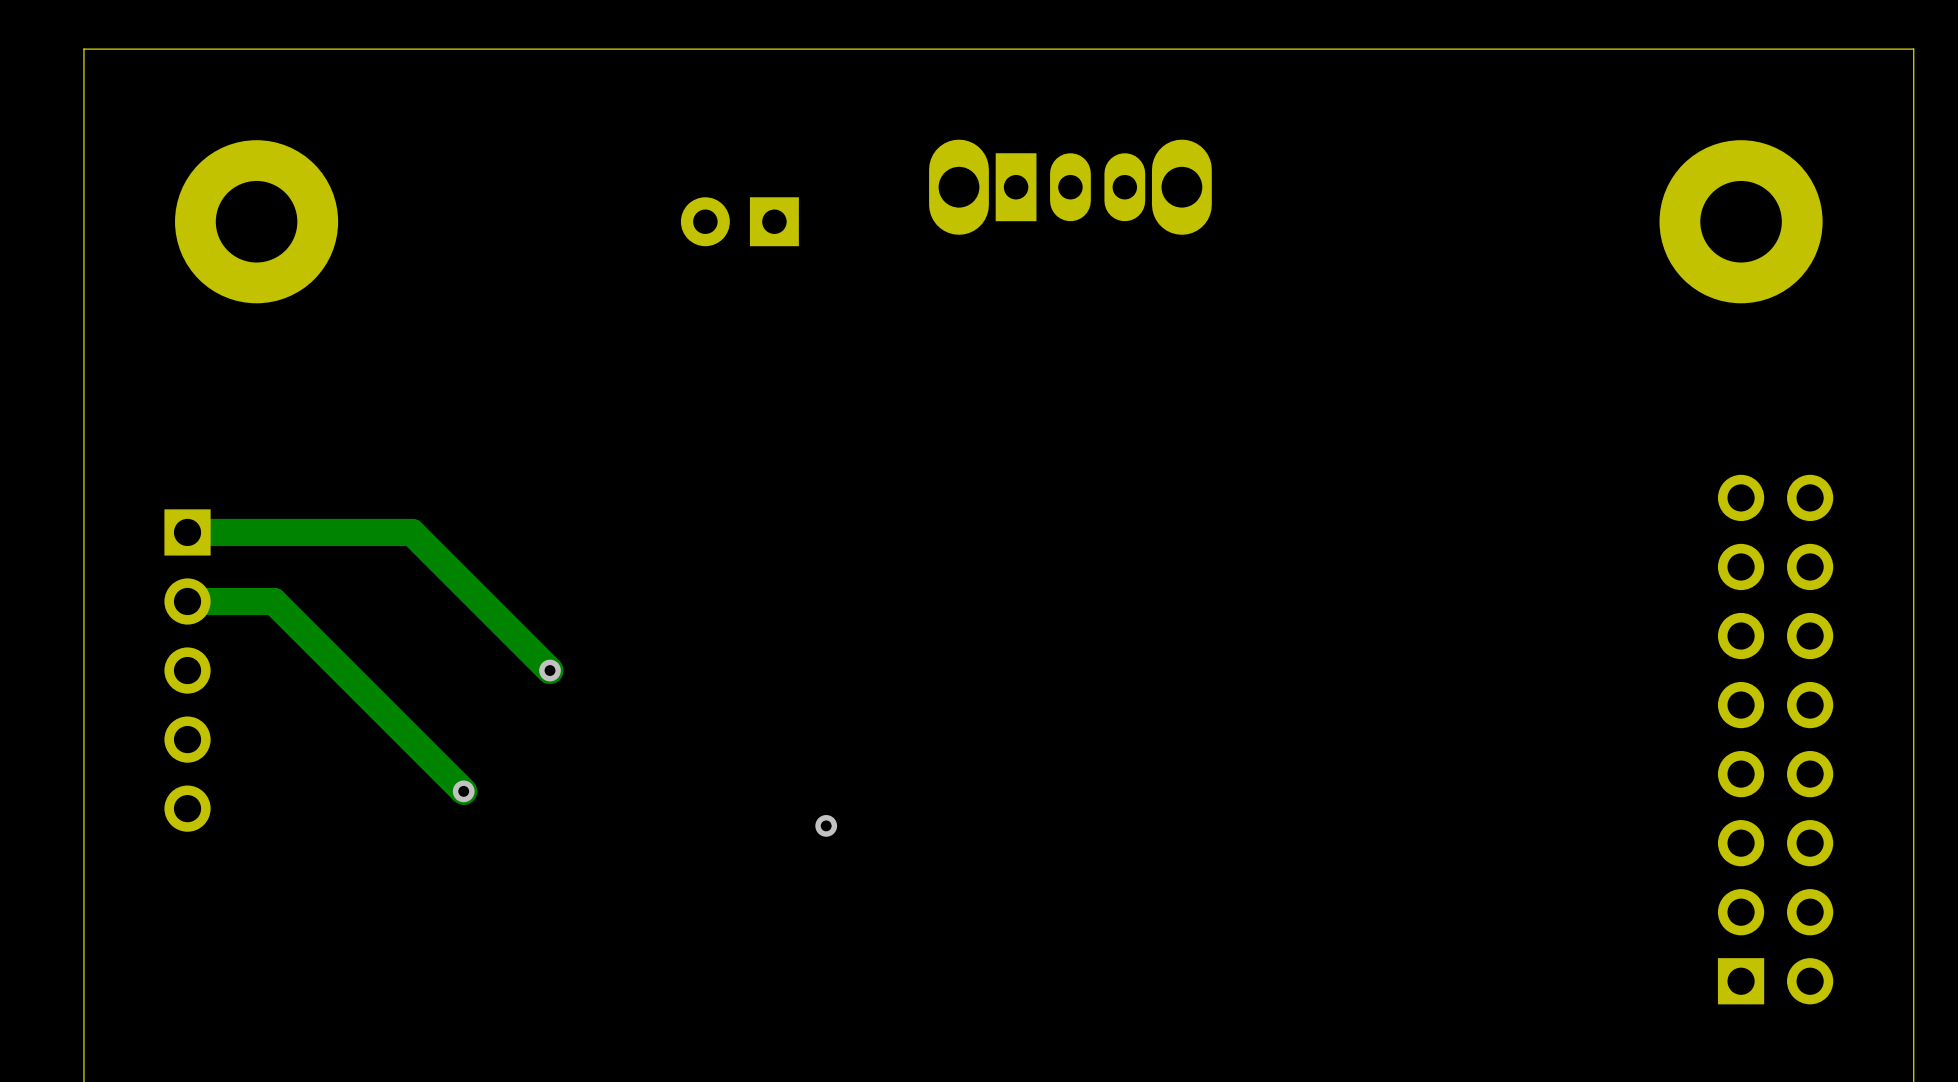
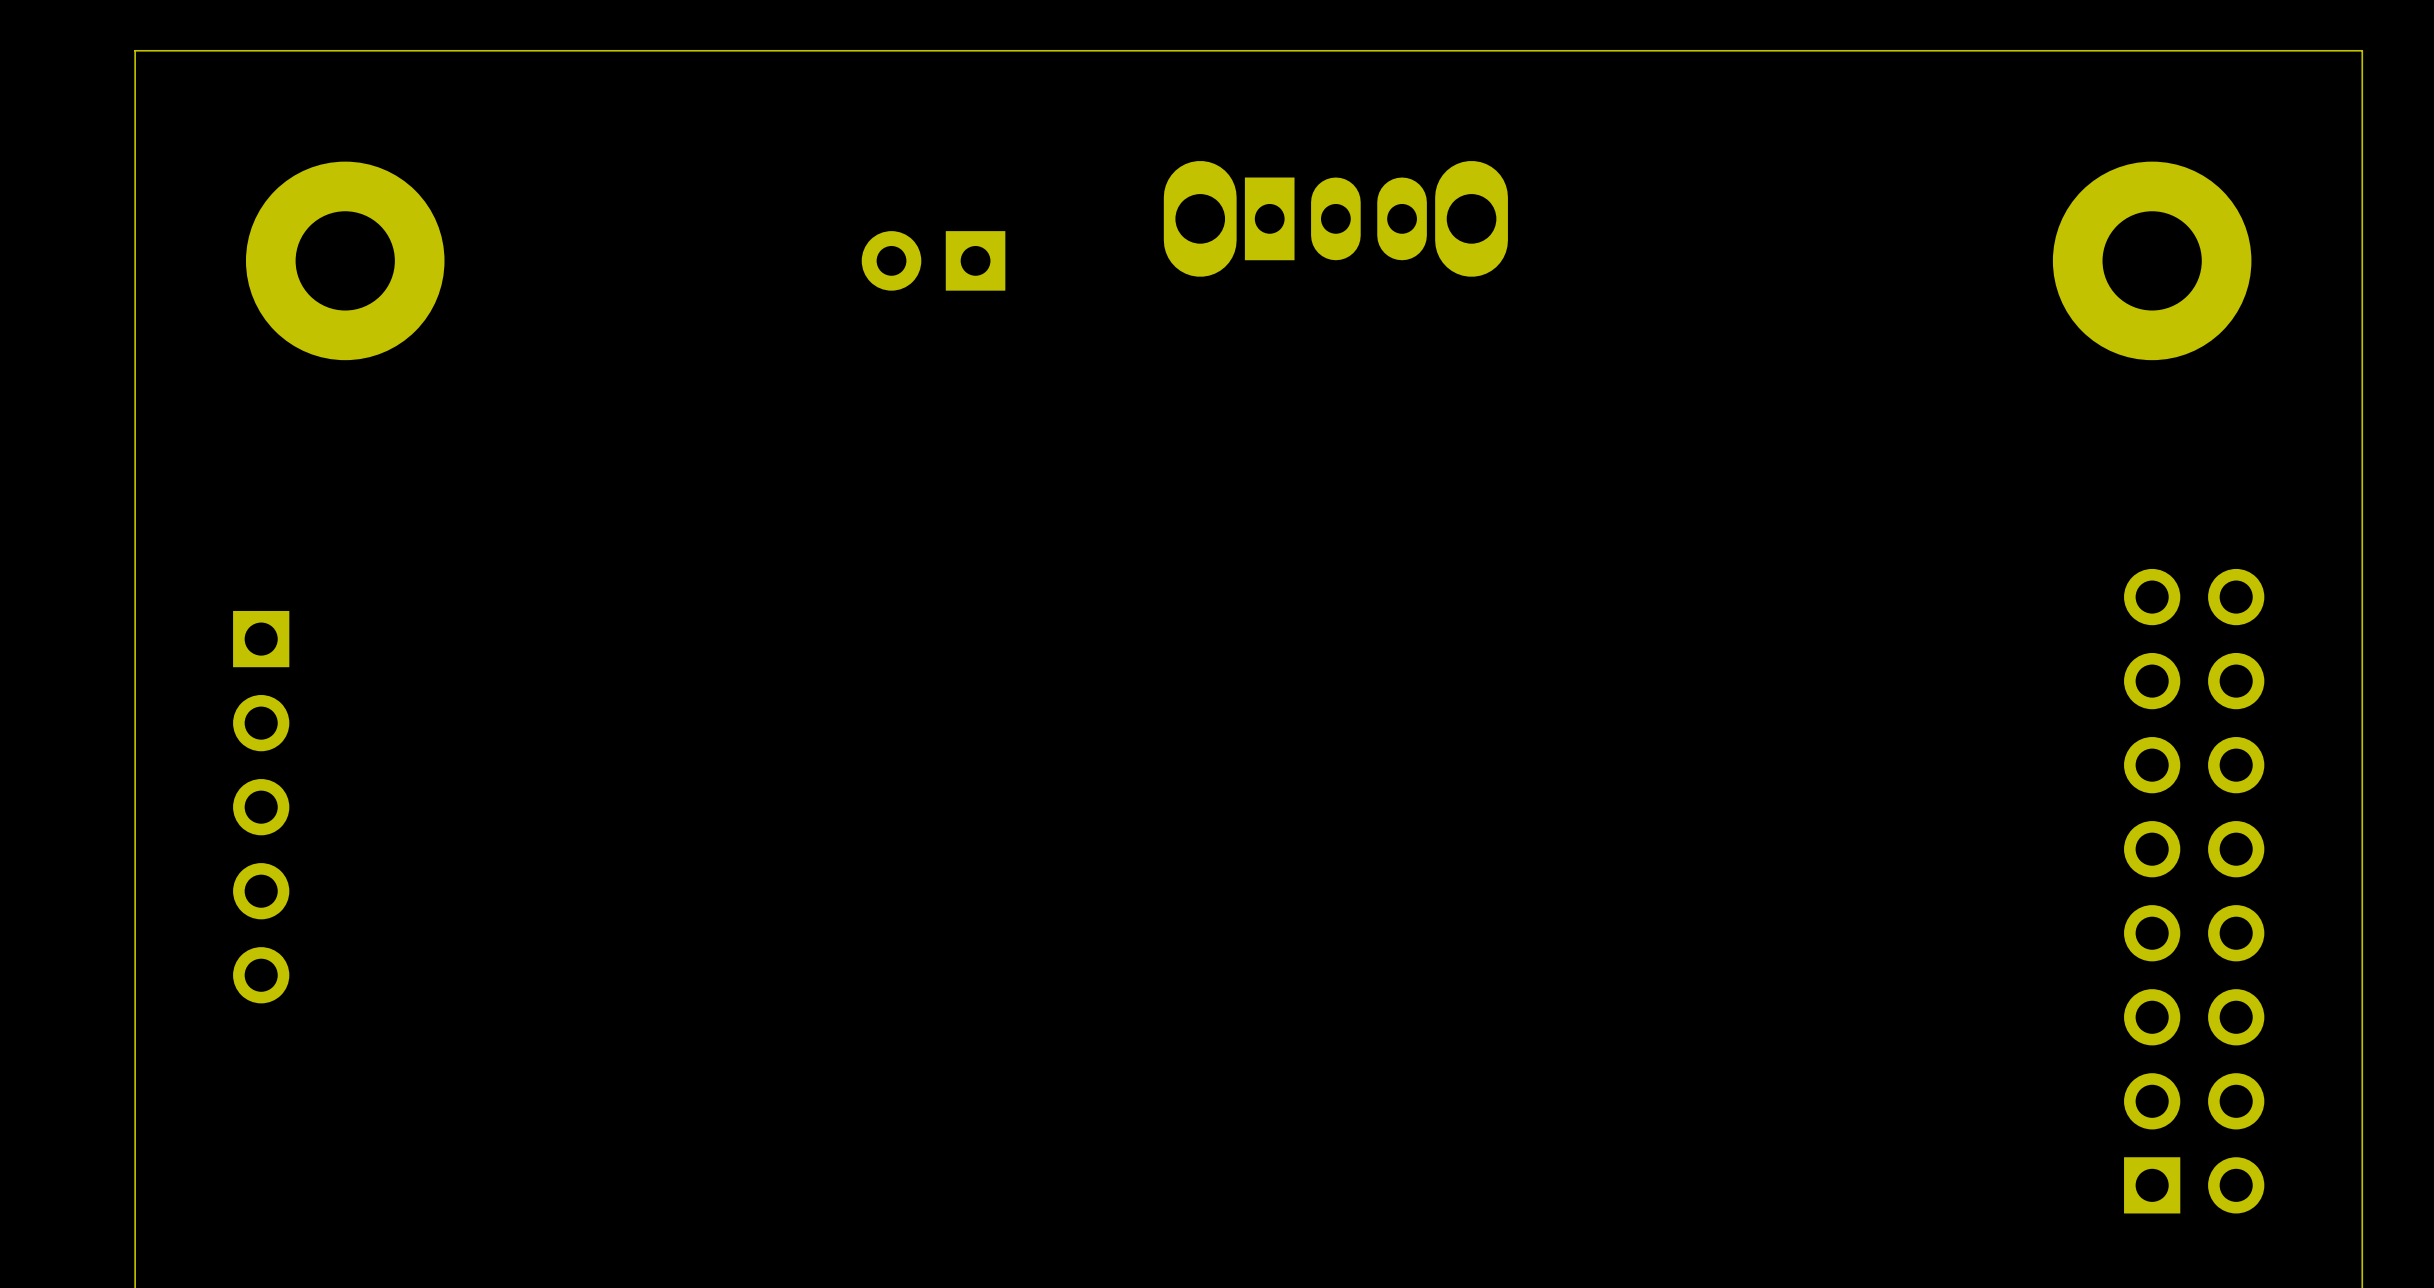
track: (187, 532) (411, 532) (550, 670) -> none
track: (187, 601) (273, 601) (463, 791) -> none
via: (550, 670) -> none
via: (463, 791) -> none
via: (826, 825) -> none

